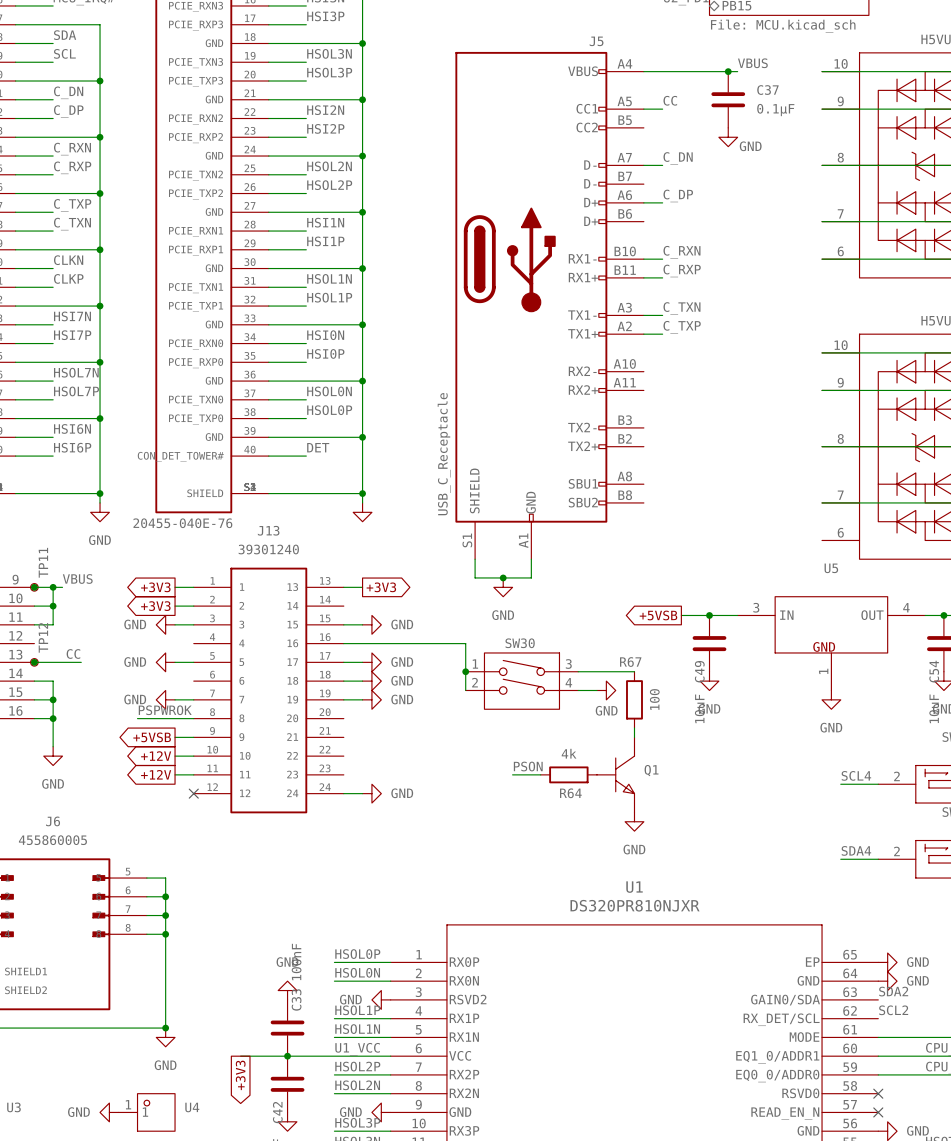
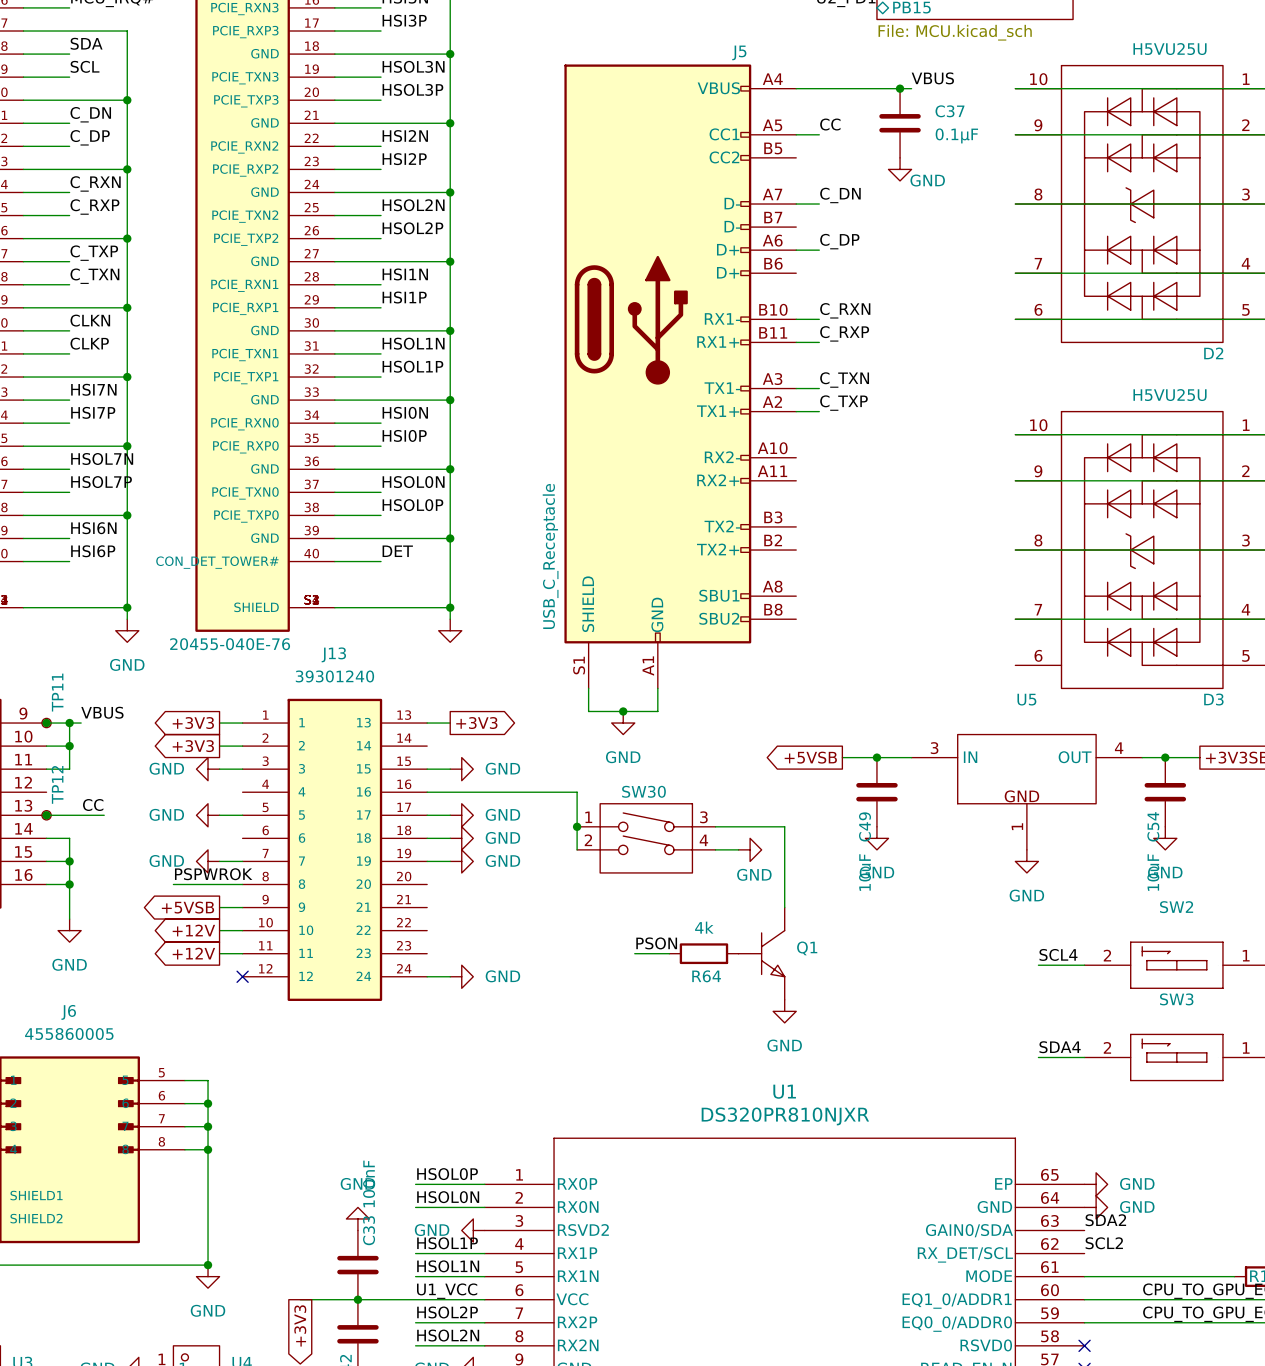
wire: none -> (784, 826) (784, 896)
R67: 100 (634, 699) -> none

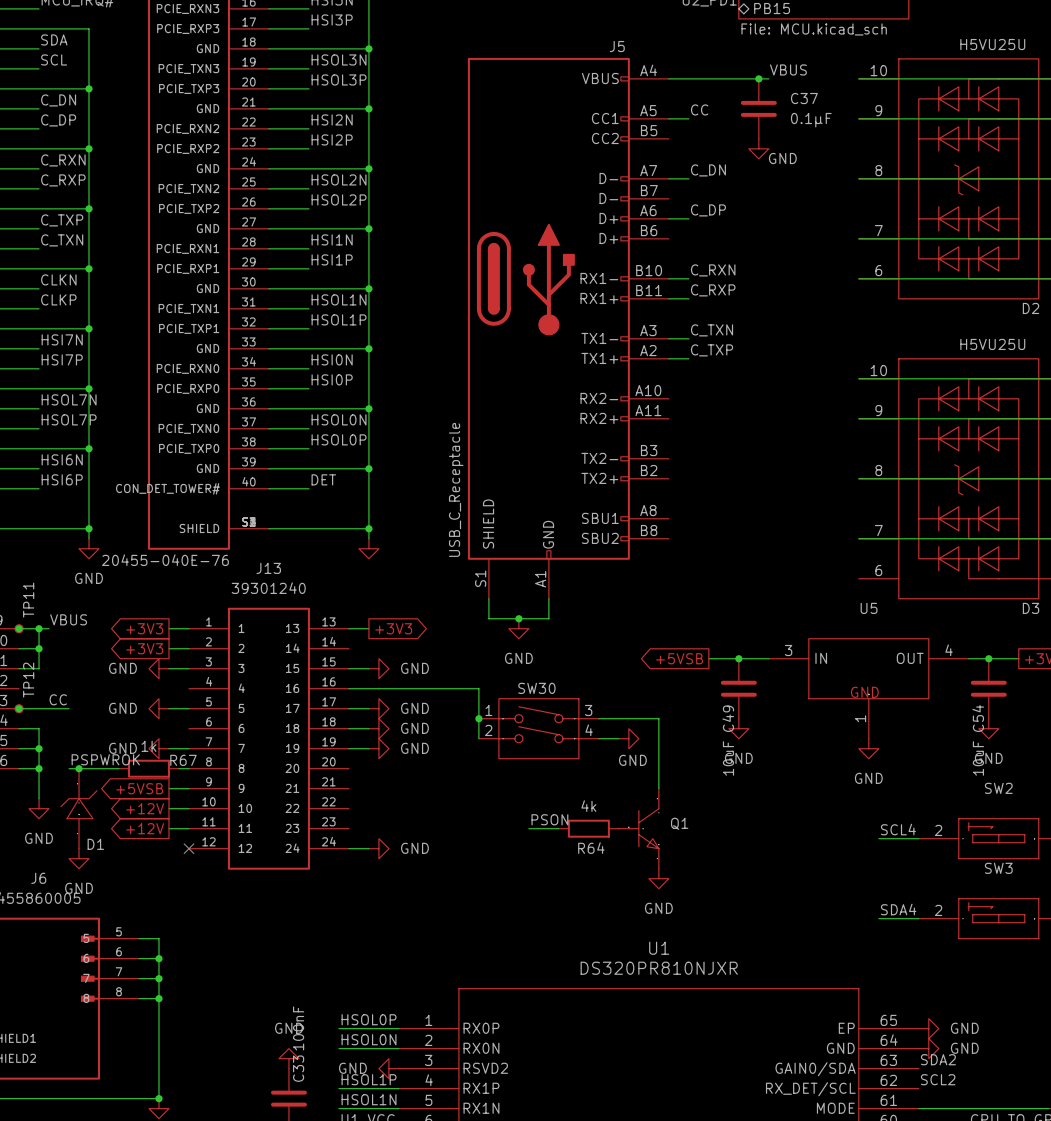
label position: PSPWROK (213, 874) -> PSPWROK (105, 759)
junction: none -> (79, 768)
wire: (173, 884) (231, 884) -> (69, 768) (119, 768)
R67: none -> 1k (148, 768)
D1: none -> (79, 808)
power symbol: none -> GND (79, 858)

